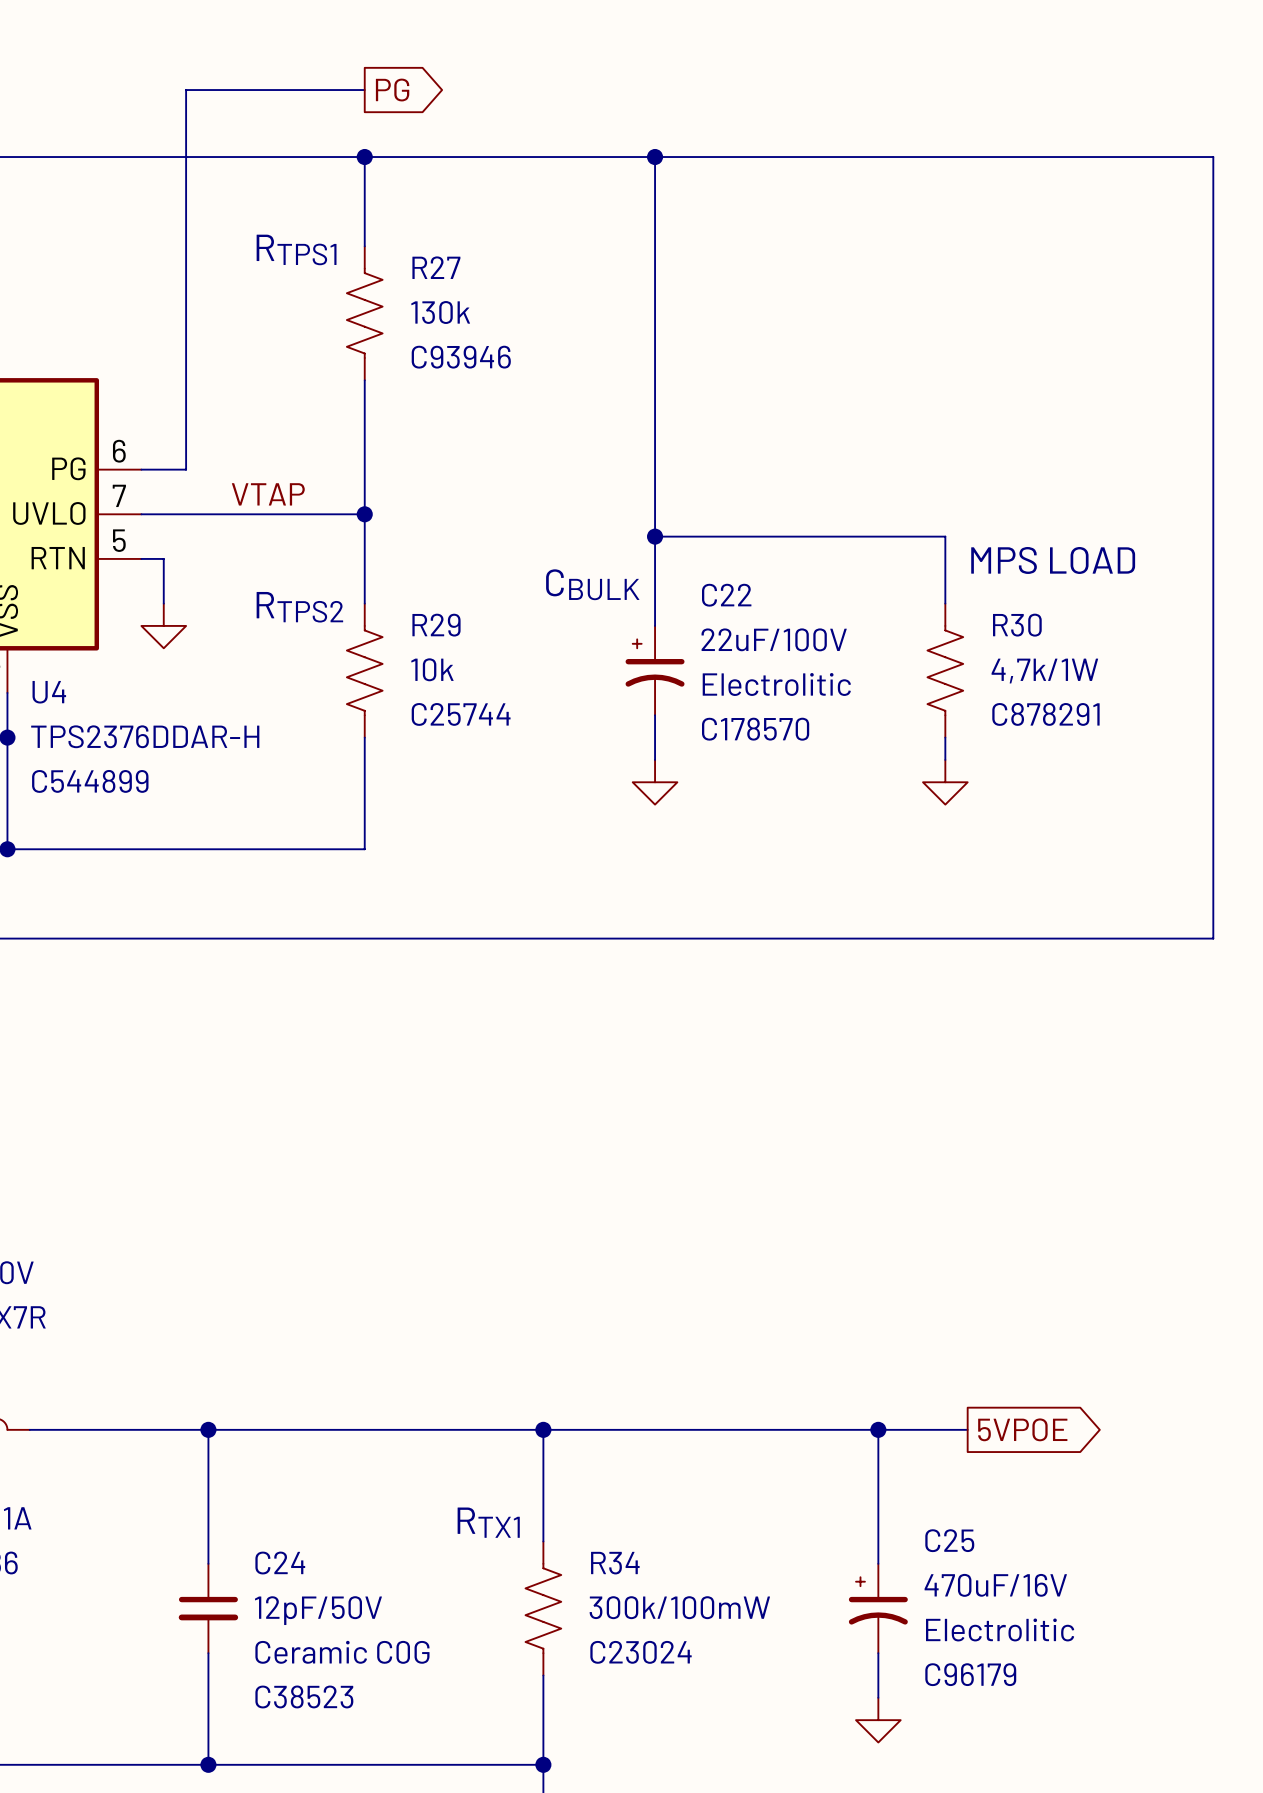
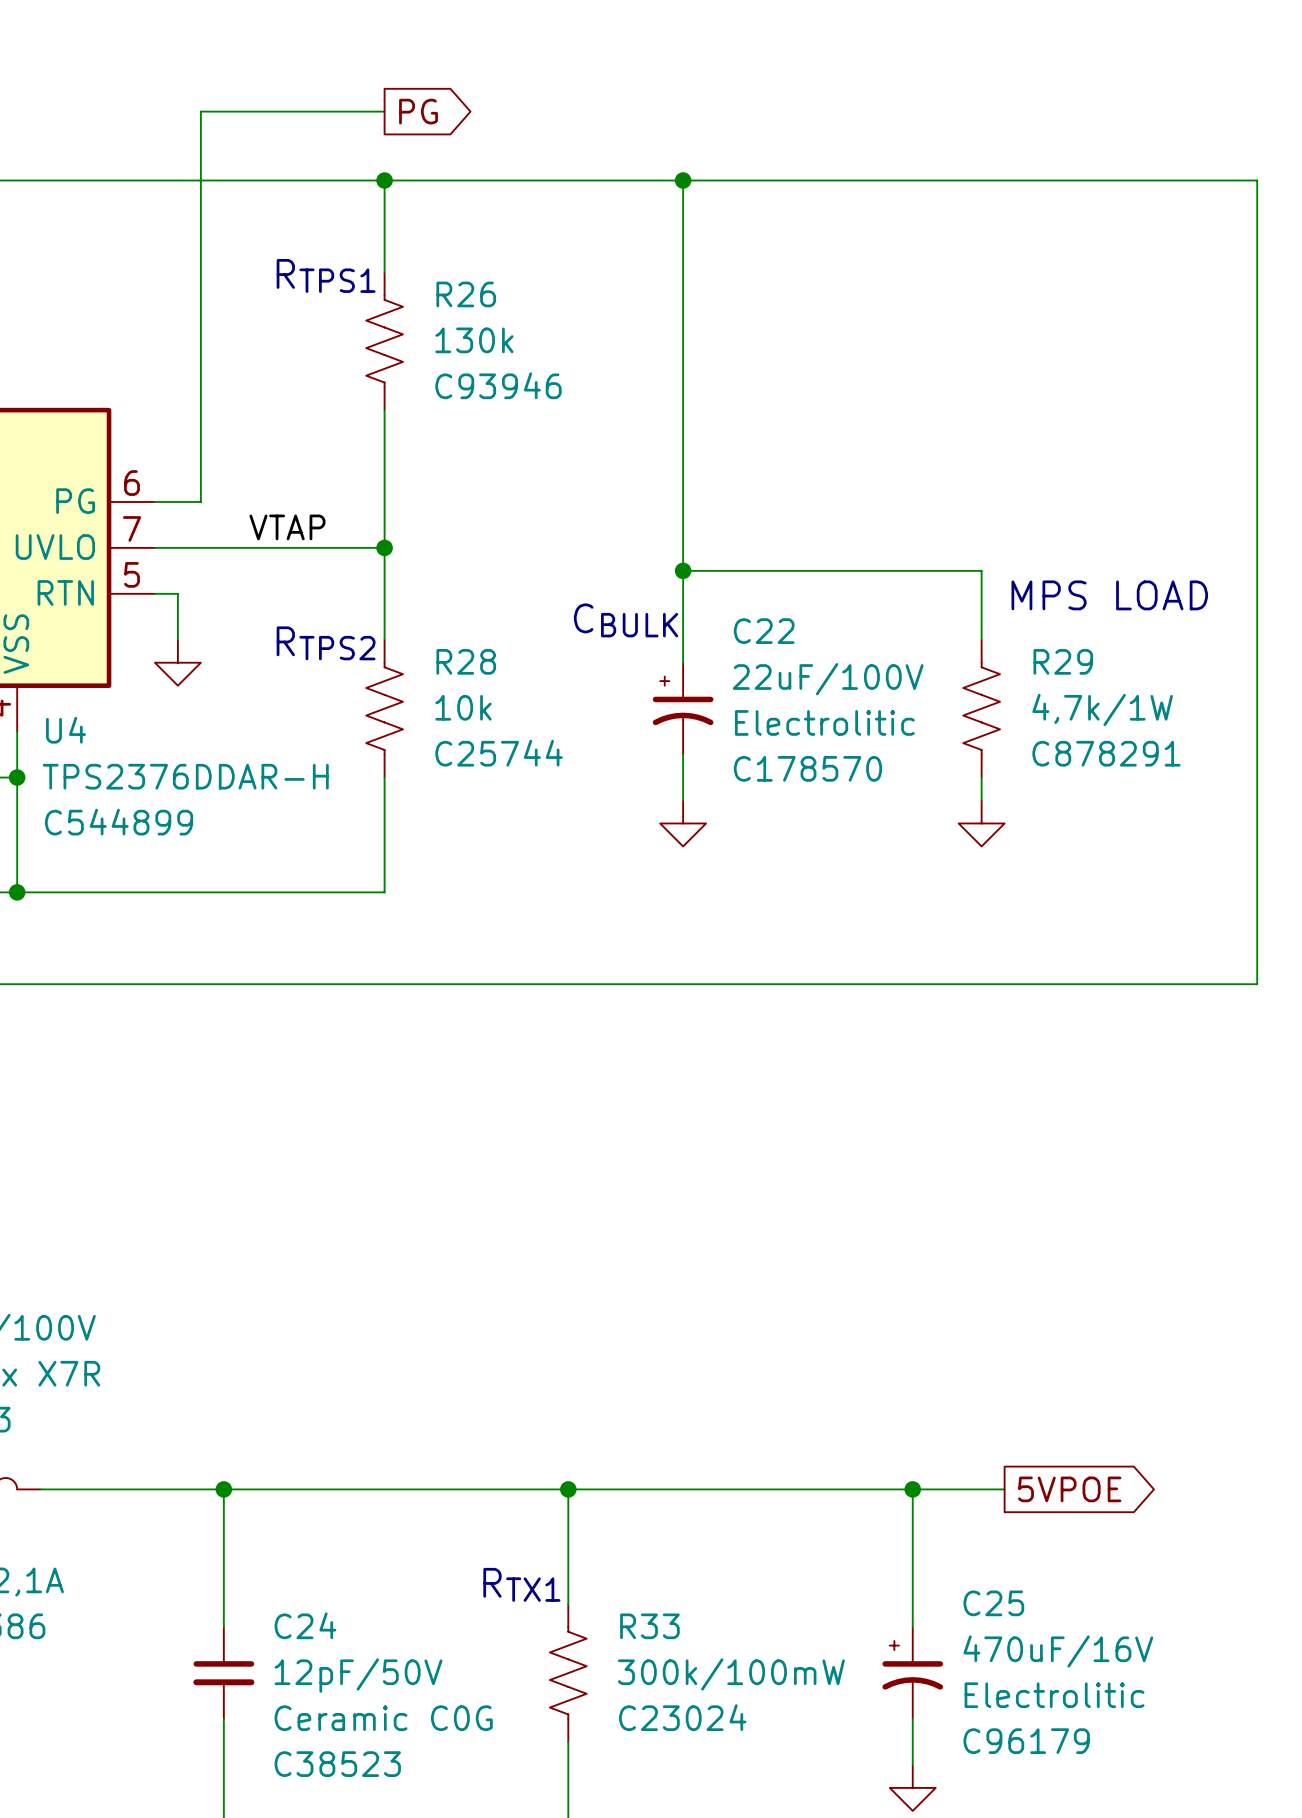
R27 name: R27 (436, 267) -> R26 (466, 294)
R29 name: R29 (436, 625) -> R28 (466, 661)
R30 name: R30 (1017, 625) -> R29 (1063, 661)
R34 name: R34 (615, 1563) -> R33 (649, 1626)

